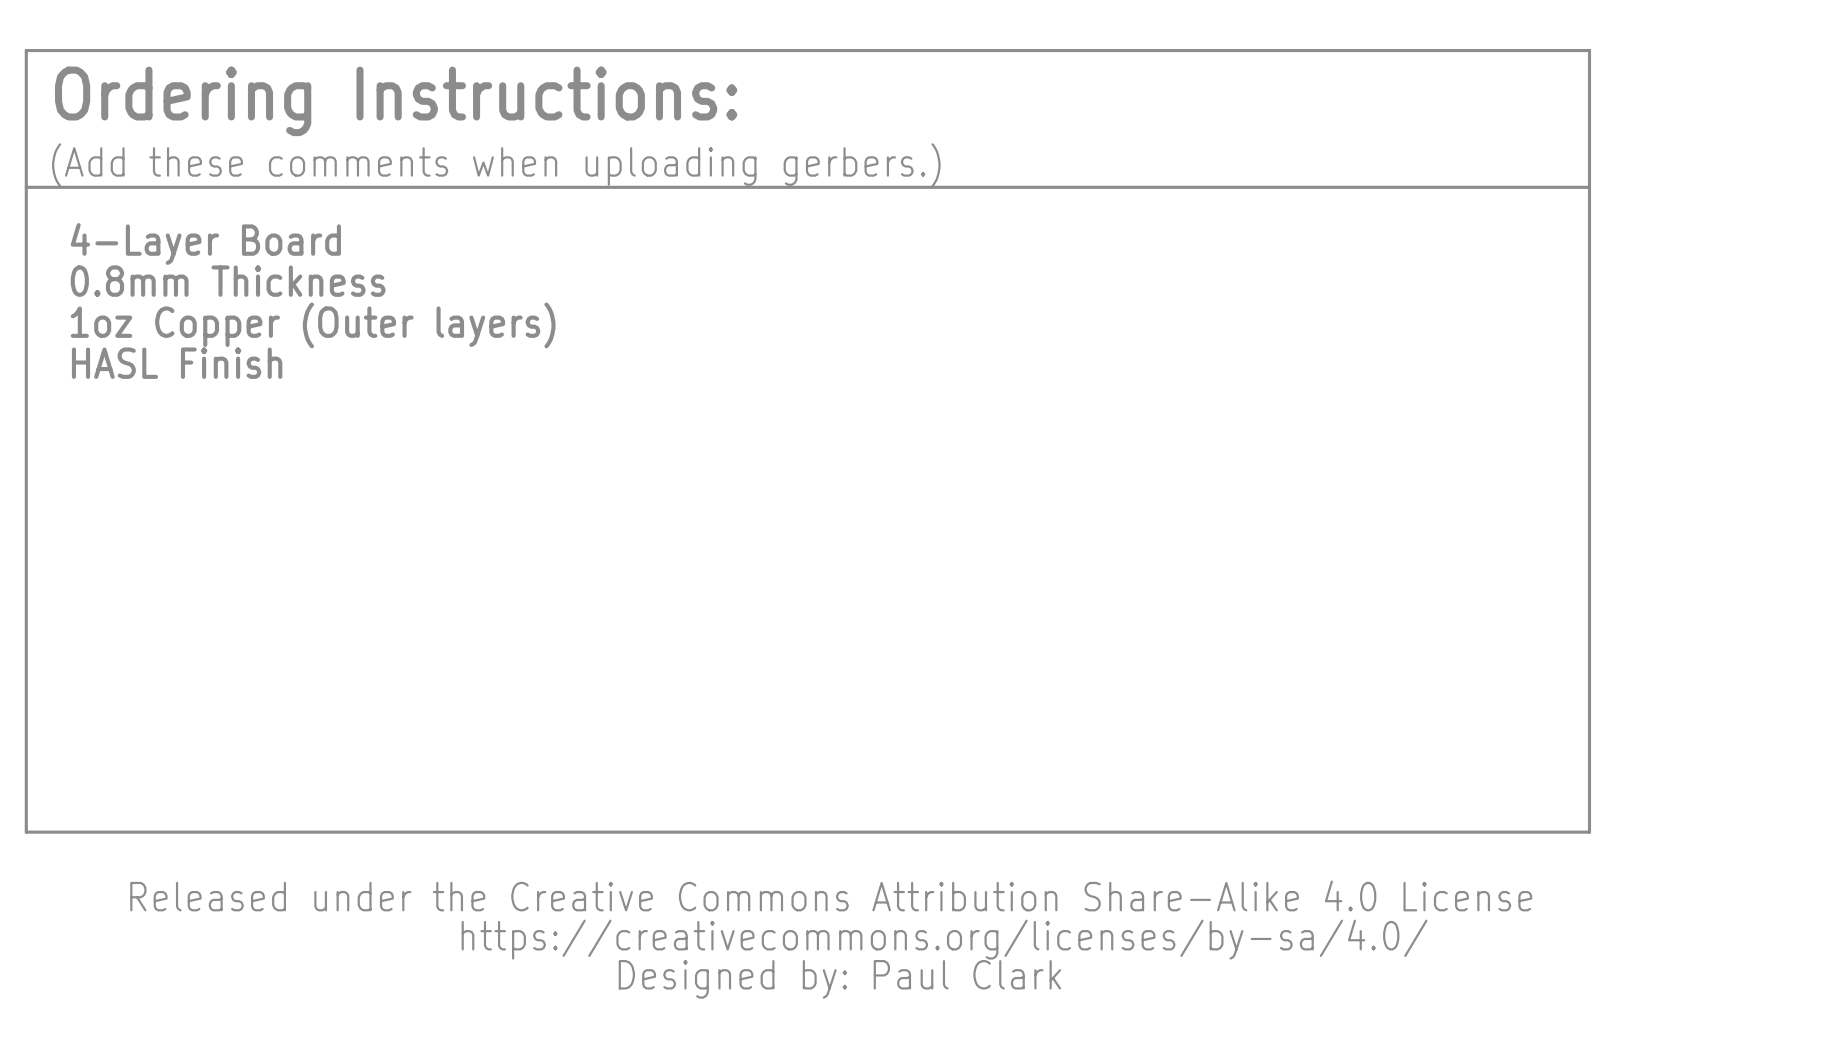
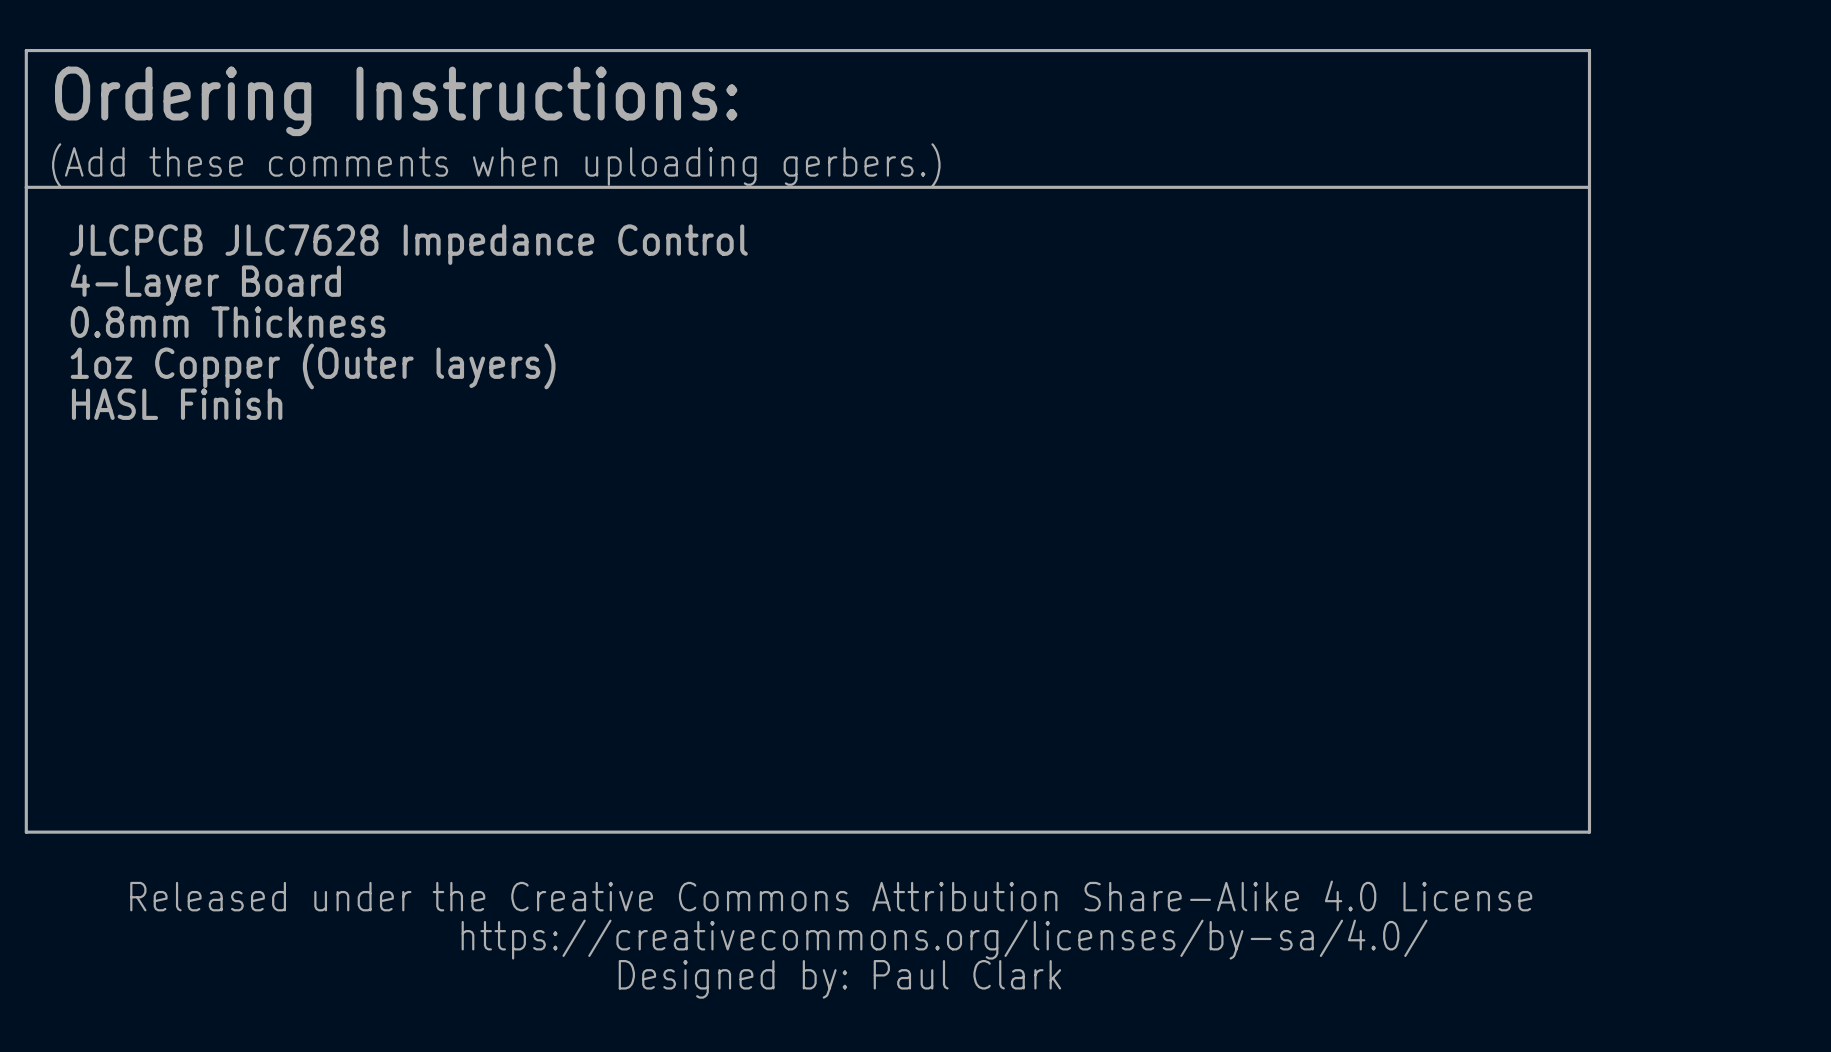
text: 4-Layer Board (205, 243) -> JLCPCB JLC7628 Impedance Control (408, 244)
text: 0.8mm Thickness (228, 281) -> 4-Layer Board (205, 285)
text: 1oz Copper (Outer layers) (313, 325) -> 0.8mm Thickness (228, 322)
text: HASL Finish (177, 363) -> 1oz Copper (Outer layers) (313, 366)
text: none -> HASL Finish (177, 404)

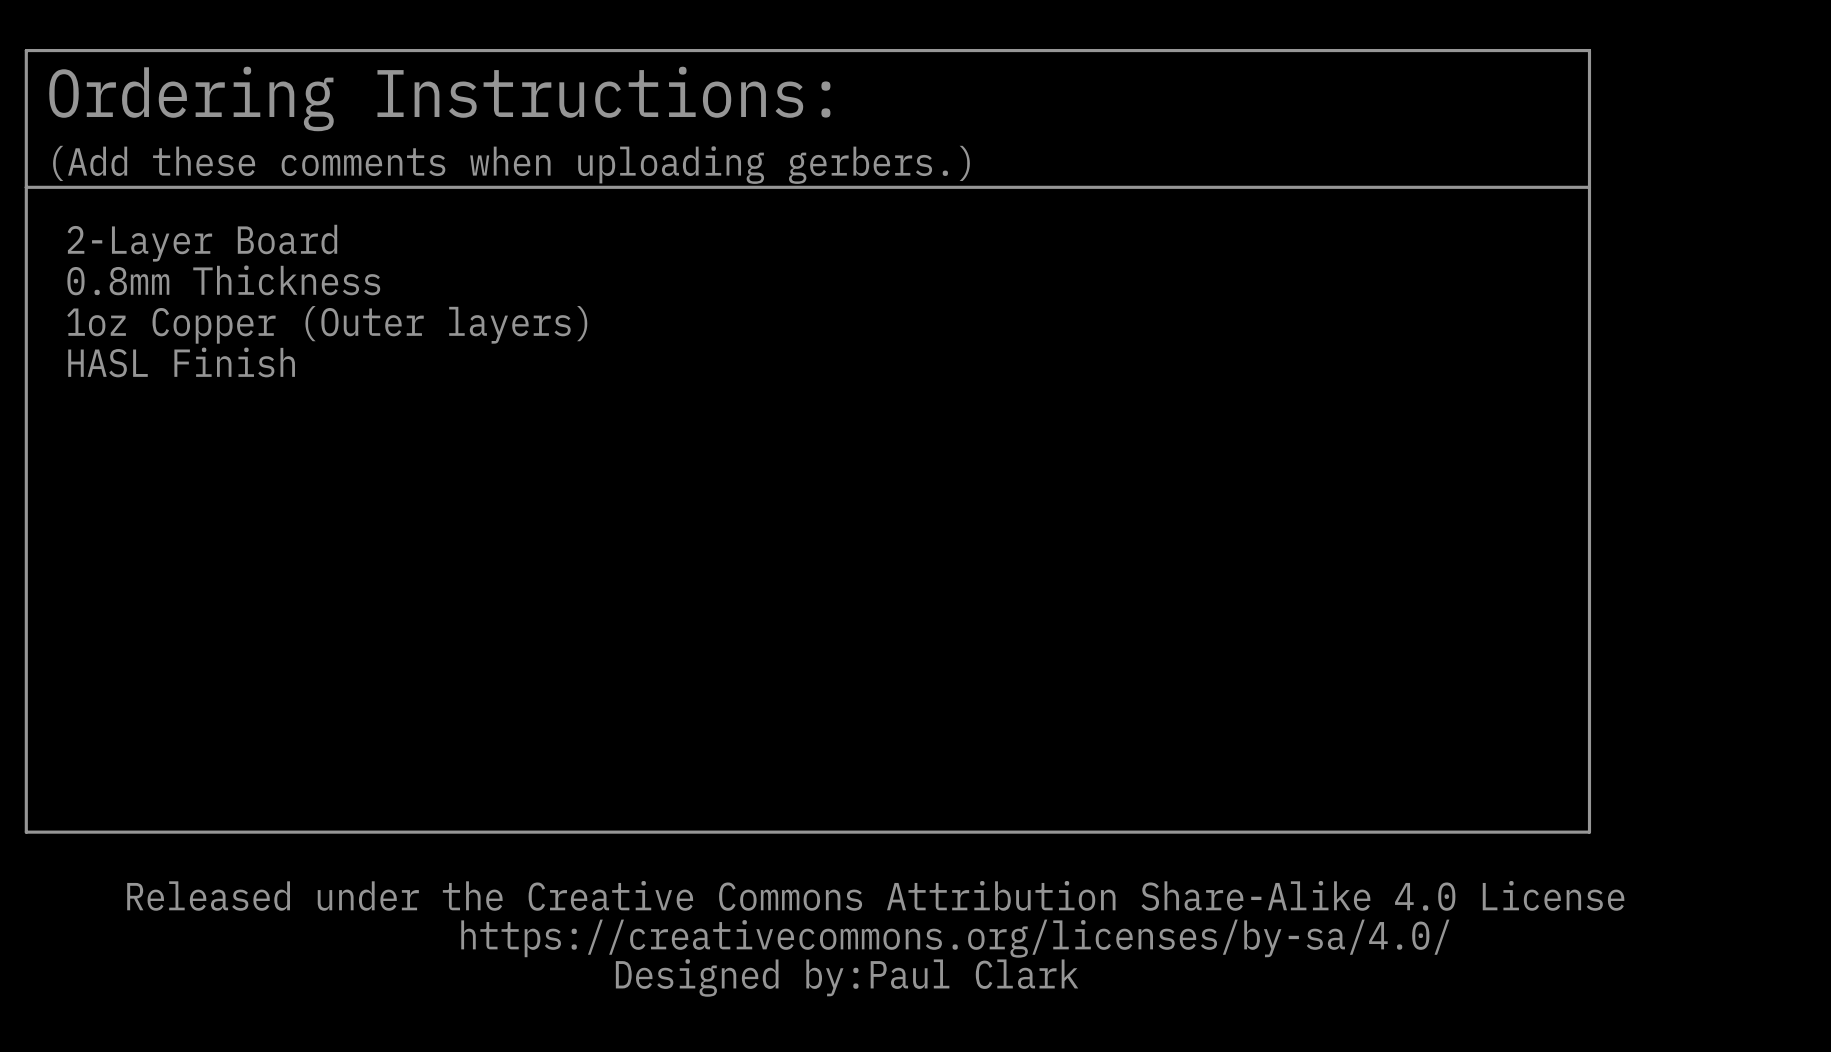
text: JLCPCB JLC7628 Impedance Control (408, 244) -> 2-Layer Board (202, 243)
text: 4-Layer Board (205, 285) -> 0.8mm Thickness (223, 280)
text: 0.8mm Thickness (228, 322) -> 1oz Copper (Outer layers) (327, 324)
text: 1oz Copper (Outer layers) (313, 366) -> HASL Finish (181, 362)
text: HASL Finish (177, 404) -> none

